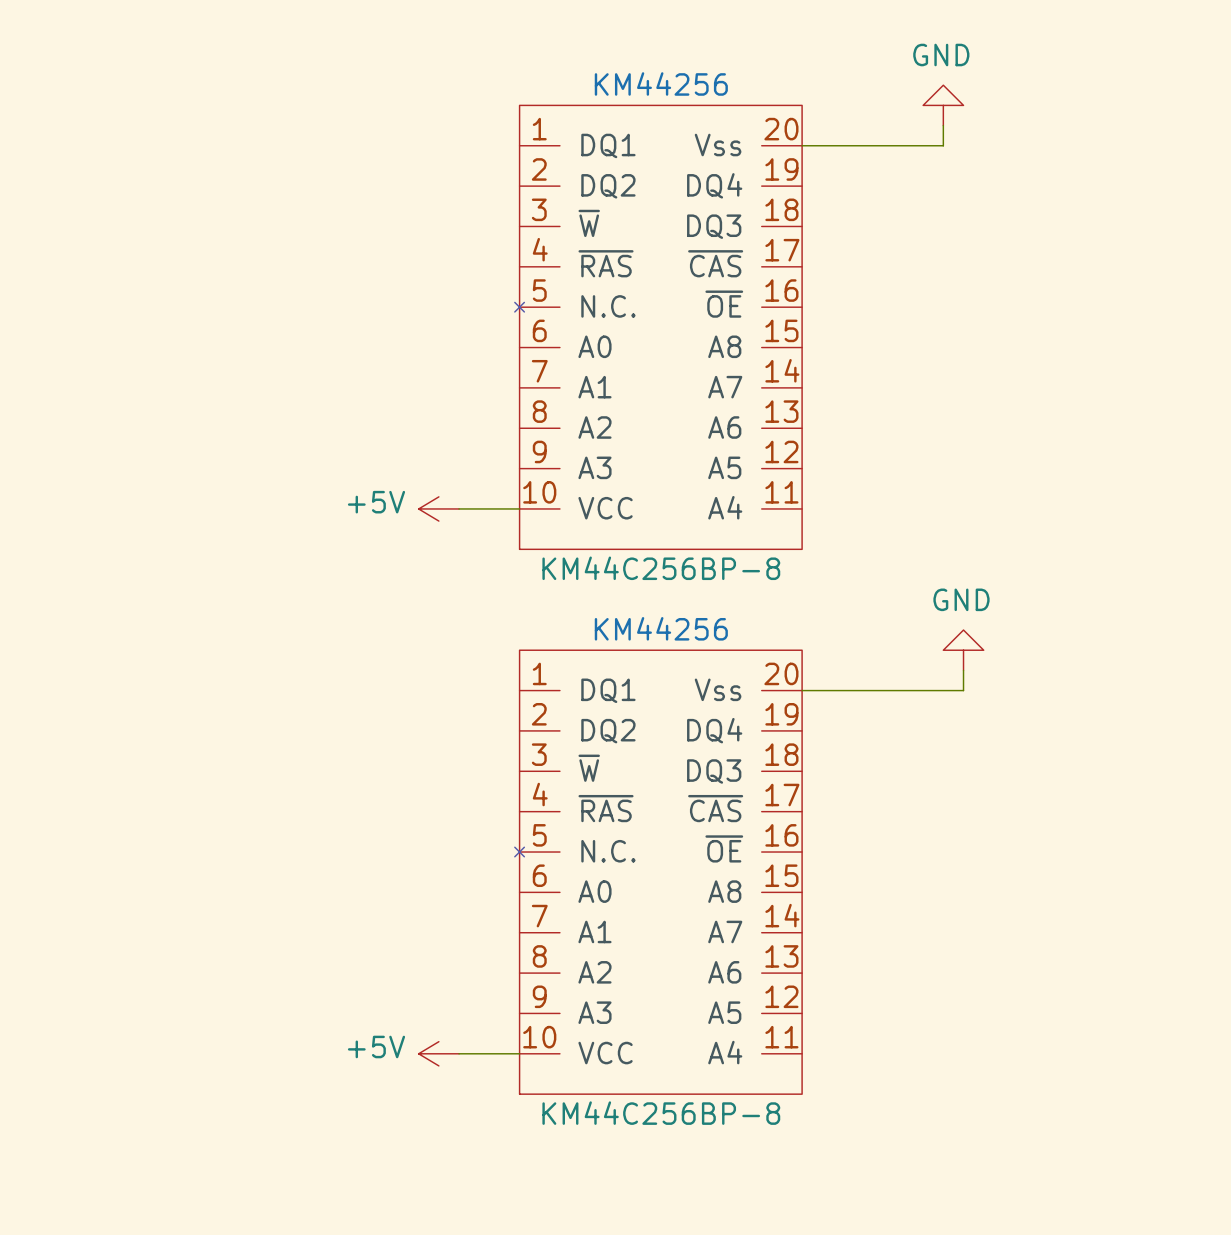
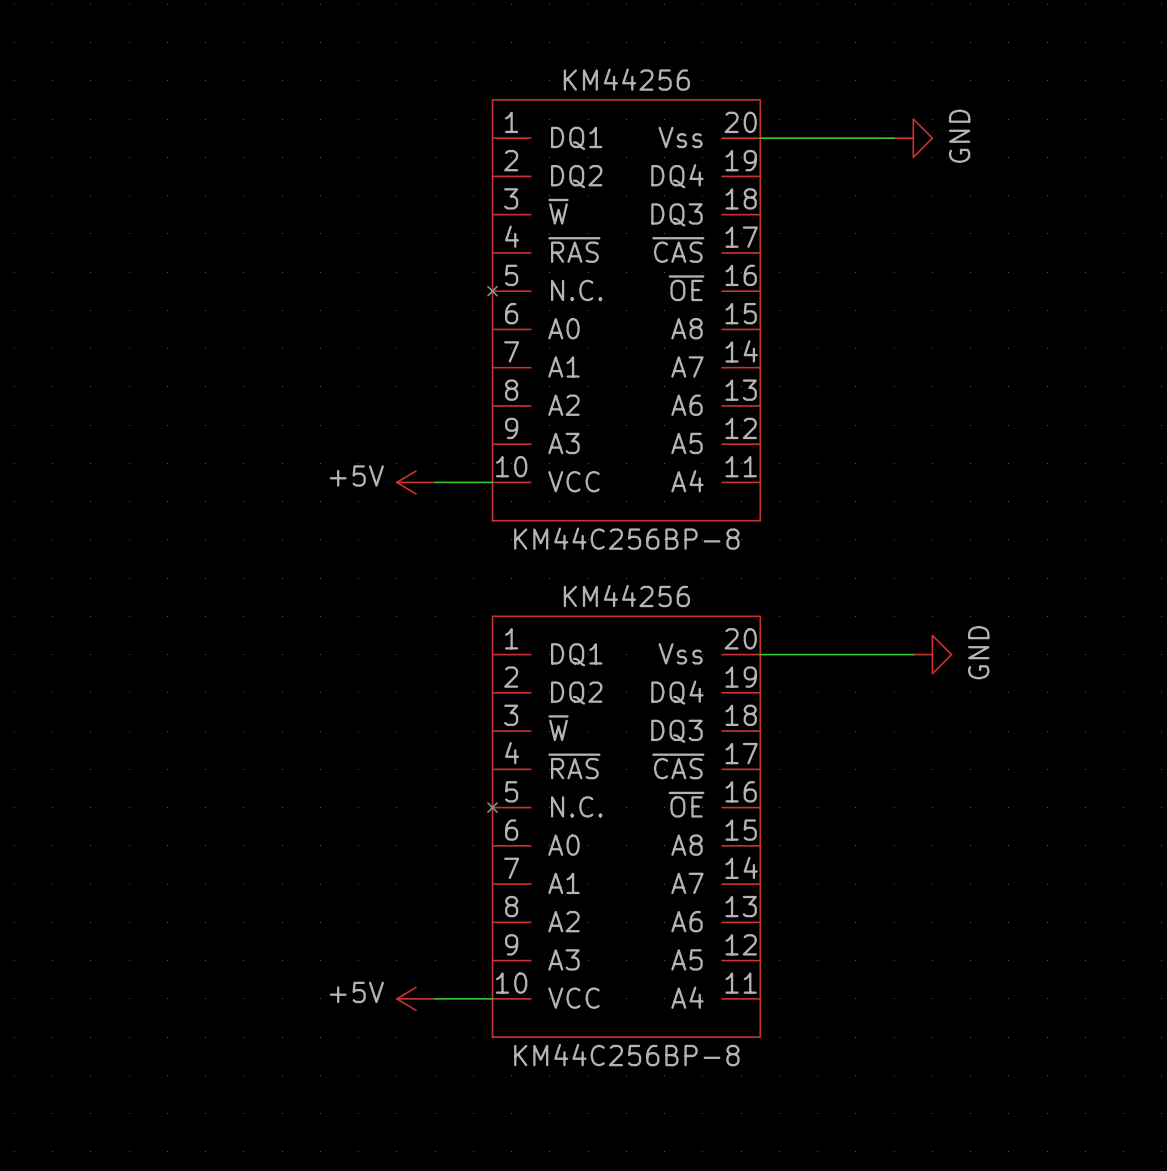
power symbol rotation: 0° (943, 105) -> 90° clockwise (913, 138)
power symbol position: GND (943, 105) -> GND (913, 138)
wire: (943, 125) (943, 145) -> none
power symbol rotation: 0° (963, 650) -> 90° clockwise (932, 654)
power symbol position: GND (963, 650) -> GND (932, 654)
wire: (963, 670) (963, 690) -> none

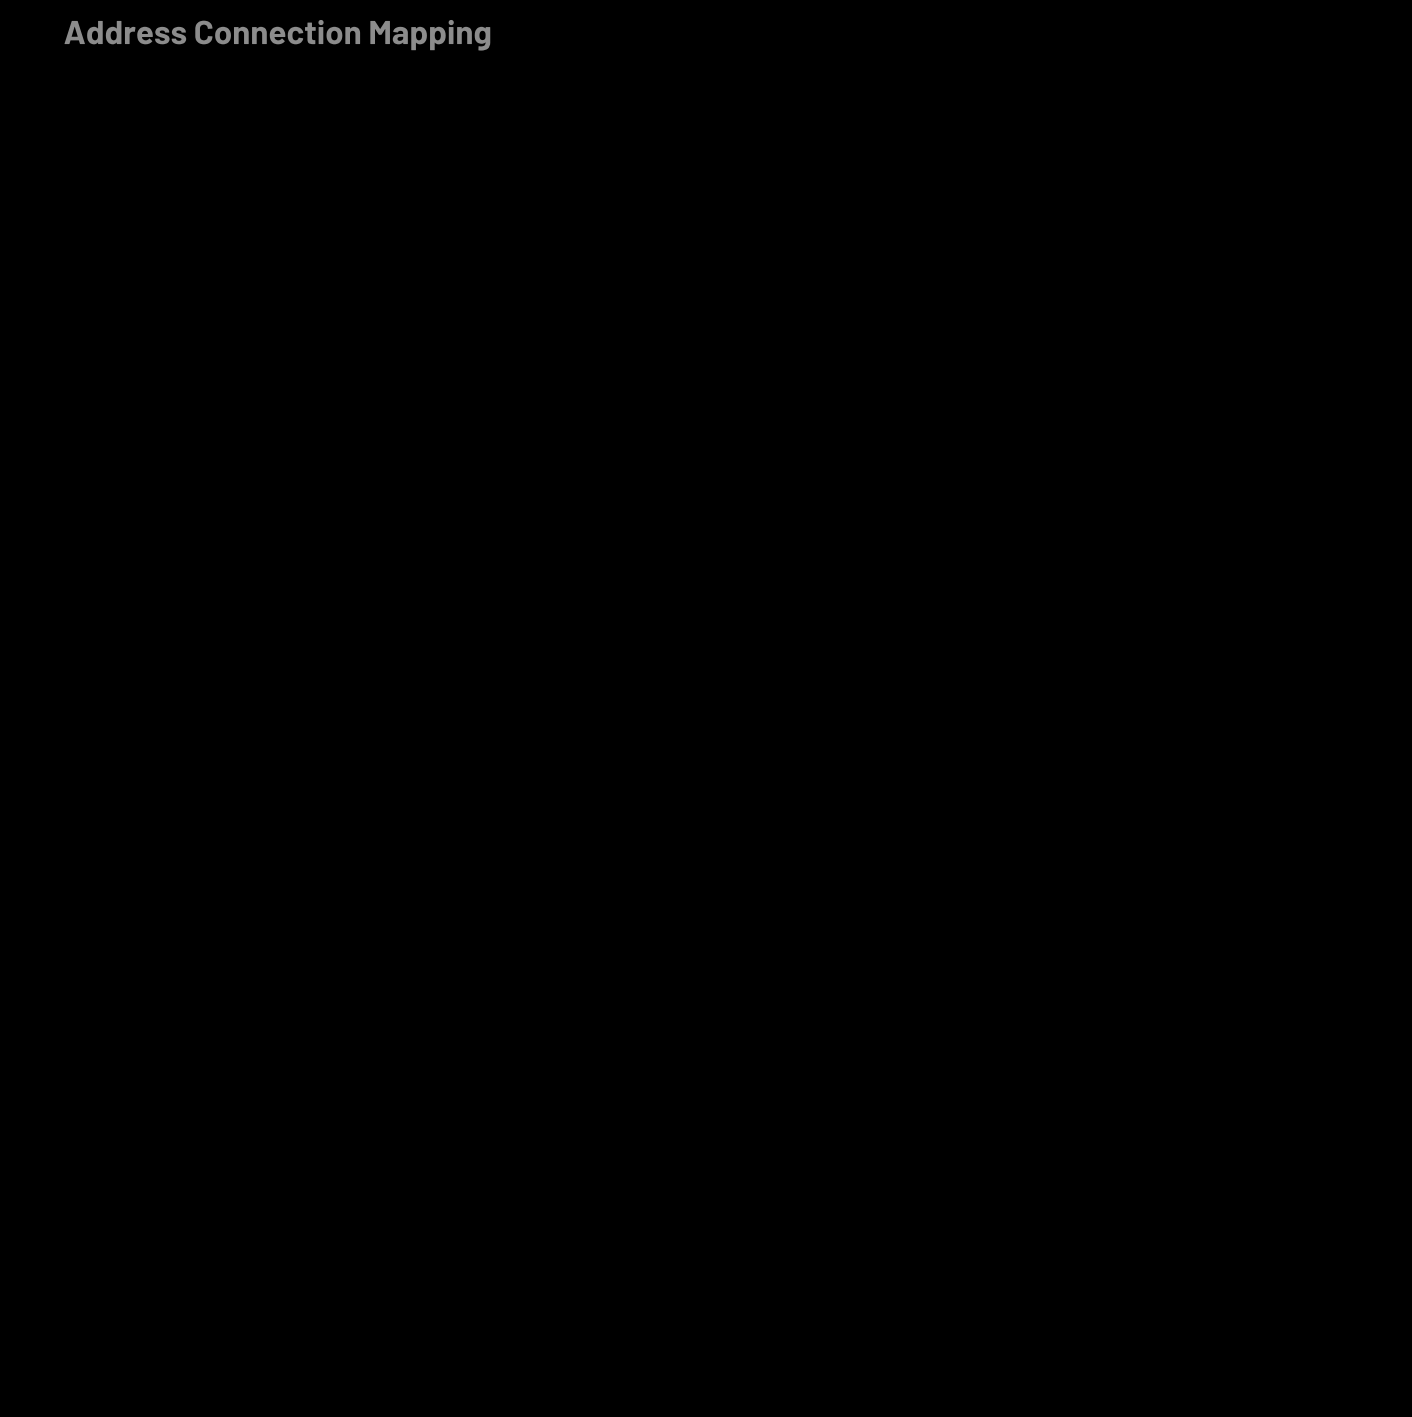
text: none -> Address Connection Mapping (277, 35)
wire: (760, 138) (894, 138) -> none
power symbol: GND (913, 138) -> none
KM44256: KM44C256BP-8 (624, 310) -> none
power symbol: +5V (415, 482) -> none
wire: (435, 482) (492, 482) -> none
wire: (760, 654) (913, 654) -> none
power symbol: GND (932, 654) -> none
KM44256: KM44C256BP-8 (624, 826) -> none
power symbol: +5V (415, 998) -> none
wire: (435, 998) (492, 998) -> none

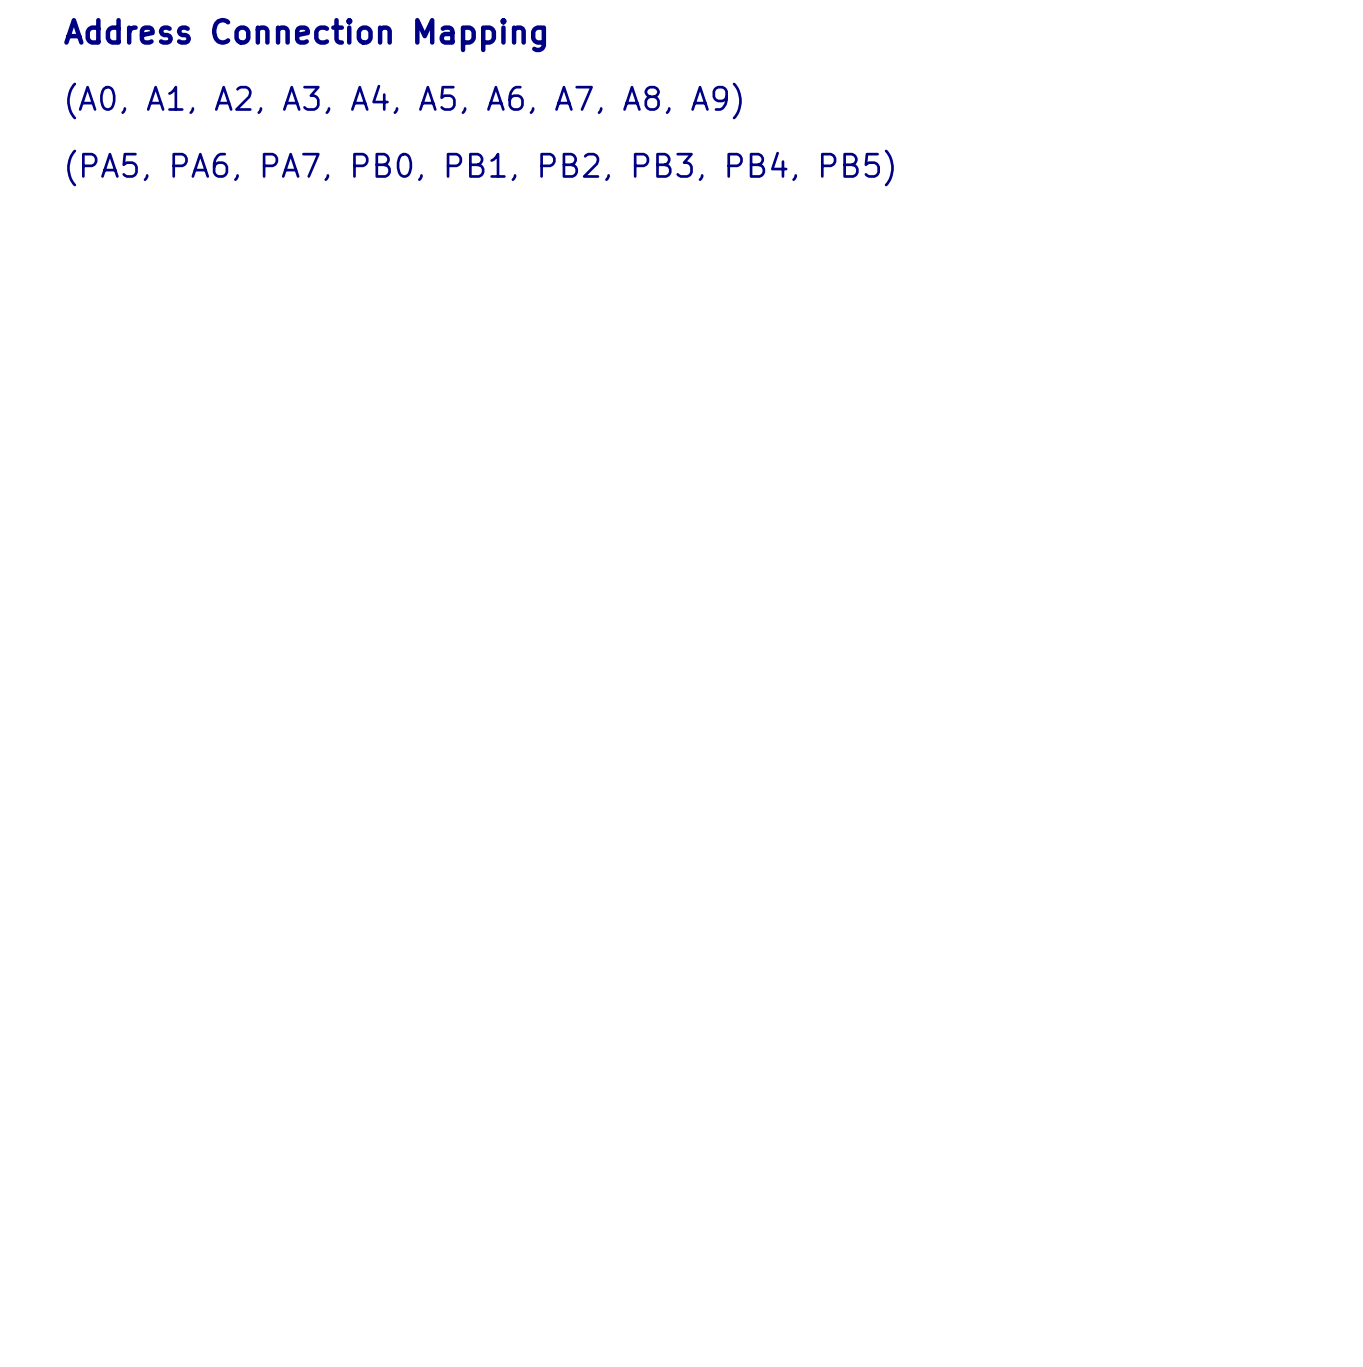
text: none -> (A0, A1, A2, A3, A4, A5, A6, A7, A8, A9) (404, 100)
text: none -> (PA5, PA6, PA7, PB0, PB1, PB2, PB3, PB4, PB5) (480, 167)

